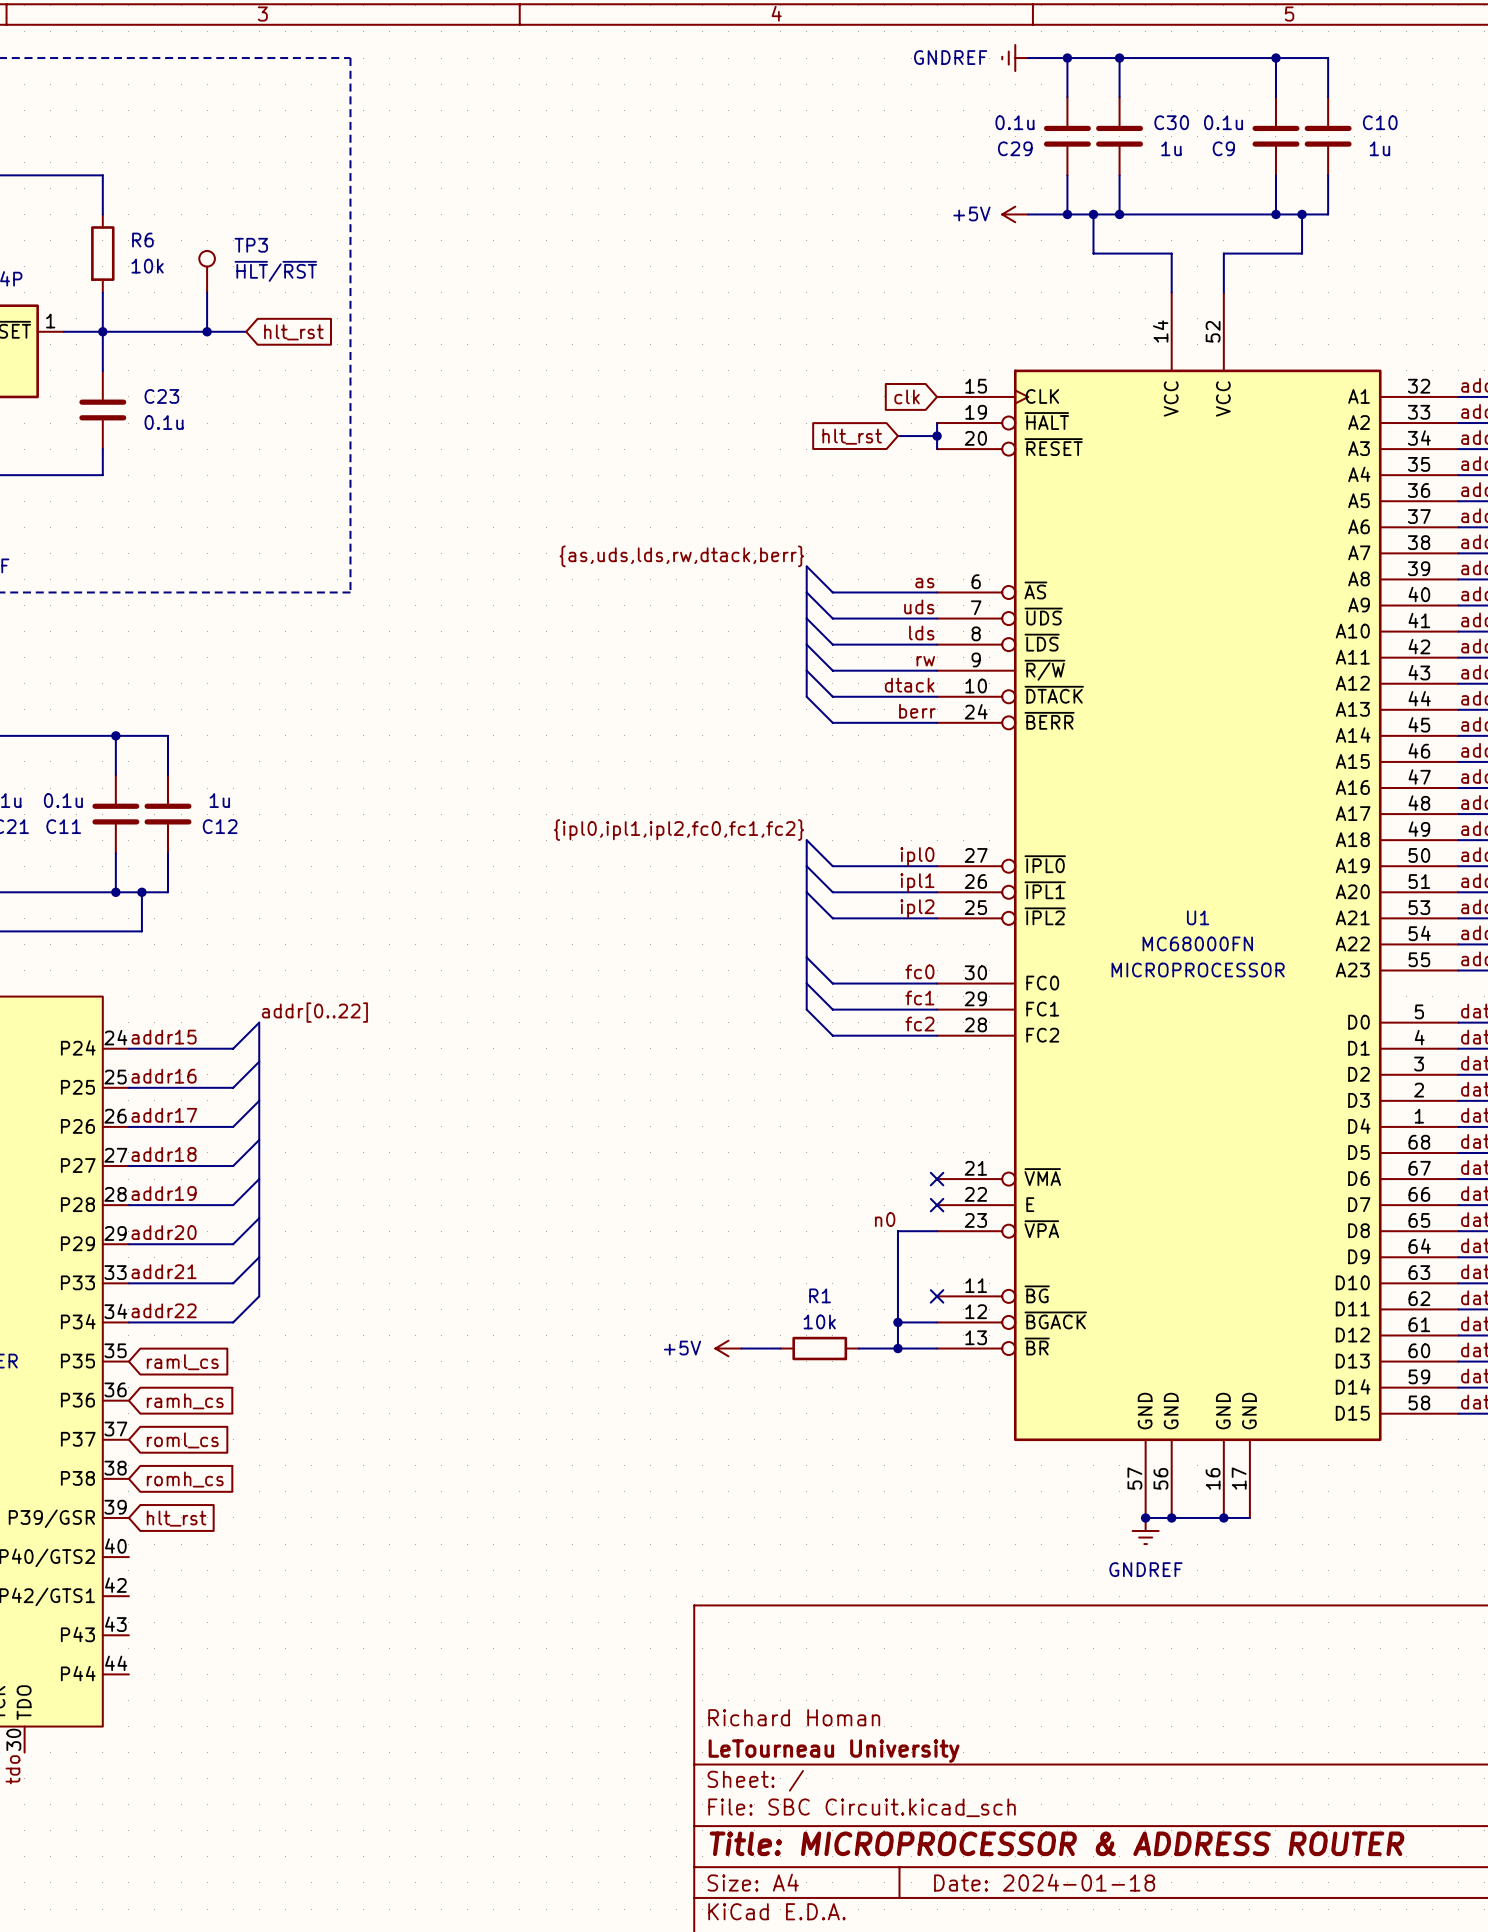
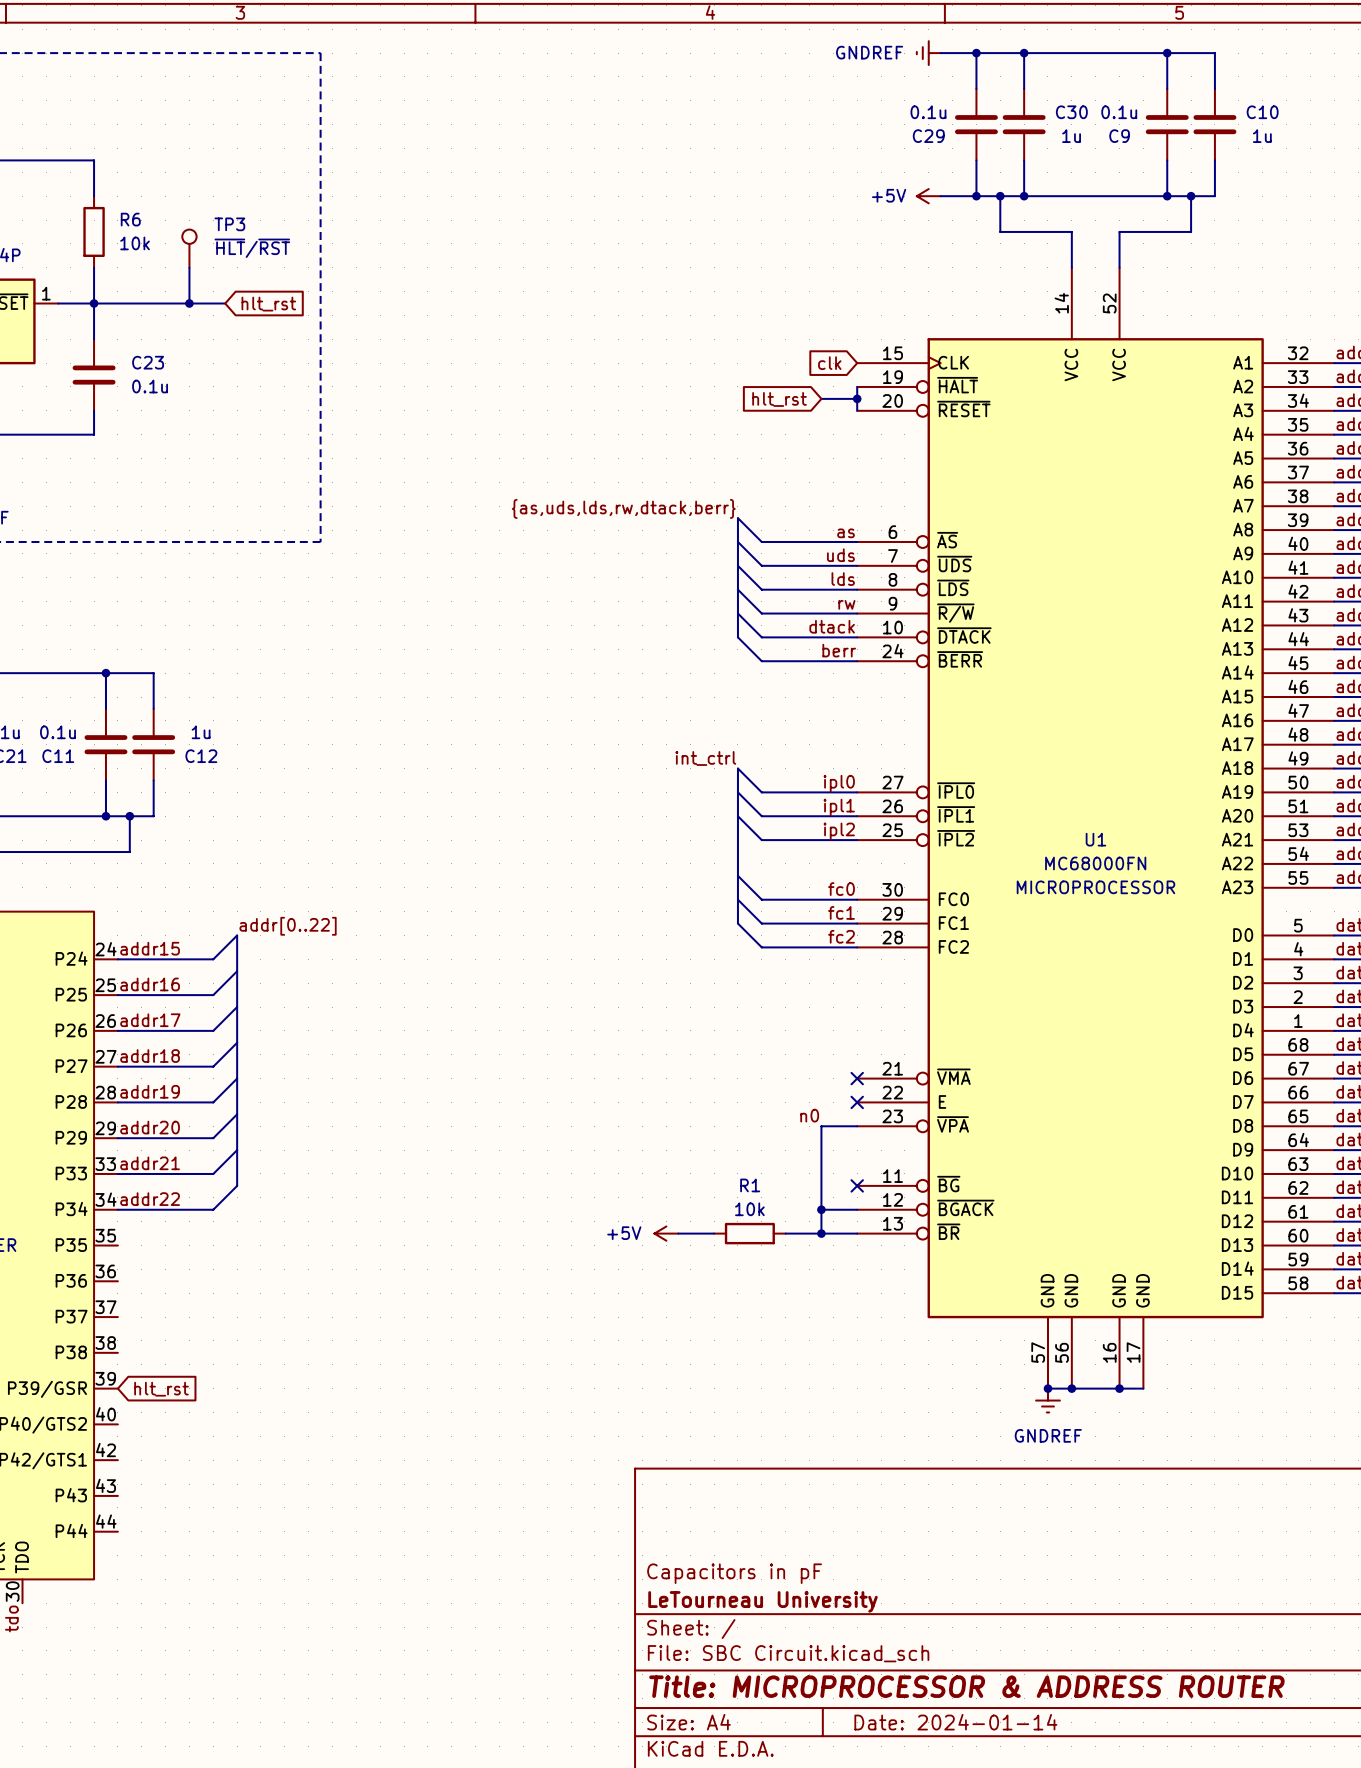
label: {ipl0,ipl1,ipl2,fc0,fc1,fc2} (679, 830) -> int_ctrl (705, 758)
global label: raml_cs (182, 1362) -> none
global label: ramh_cs (185, 1401) -> none
global label: roml_cs (182, 1440) -> none
global label: romh_cs (185, 1479) -> none
title block: Richard Homan (794, 1717) -> Capacitors in pF (734, 1573)
title block: Date: 2024-01-18 (1044, 1882) -> Date: 2024-01-14 (955, 1722)

